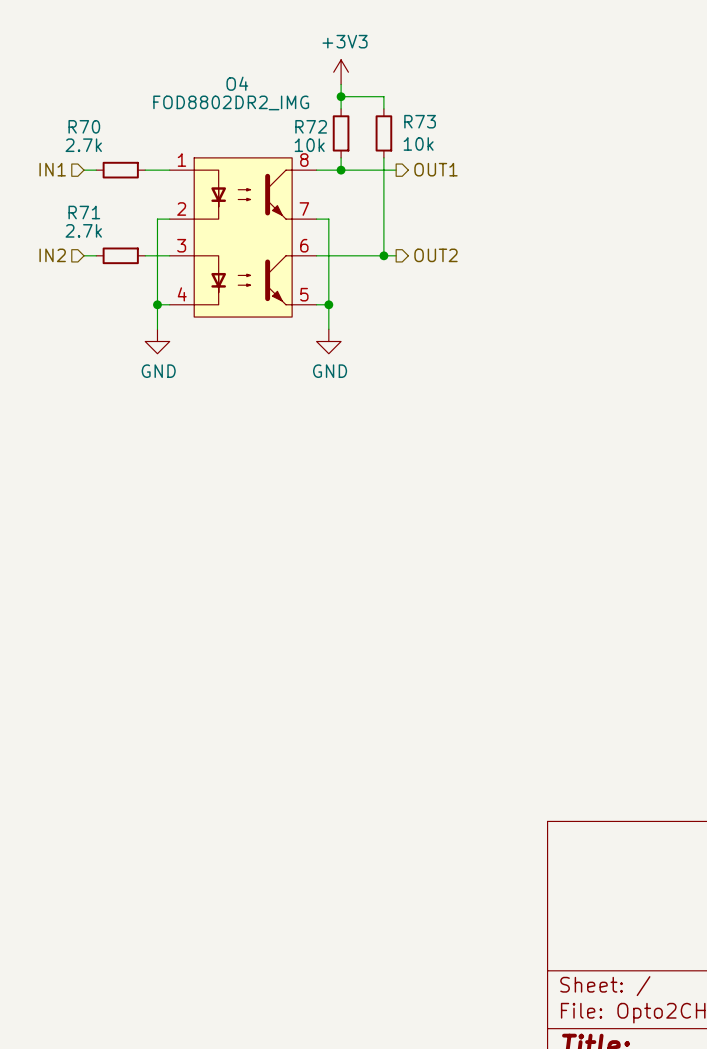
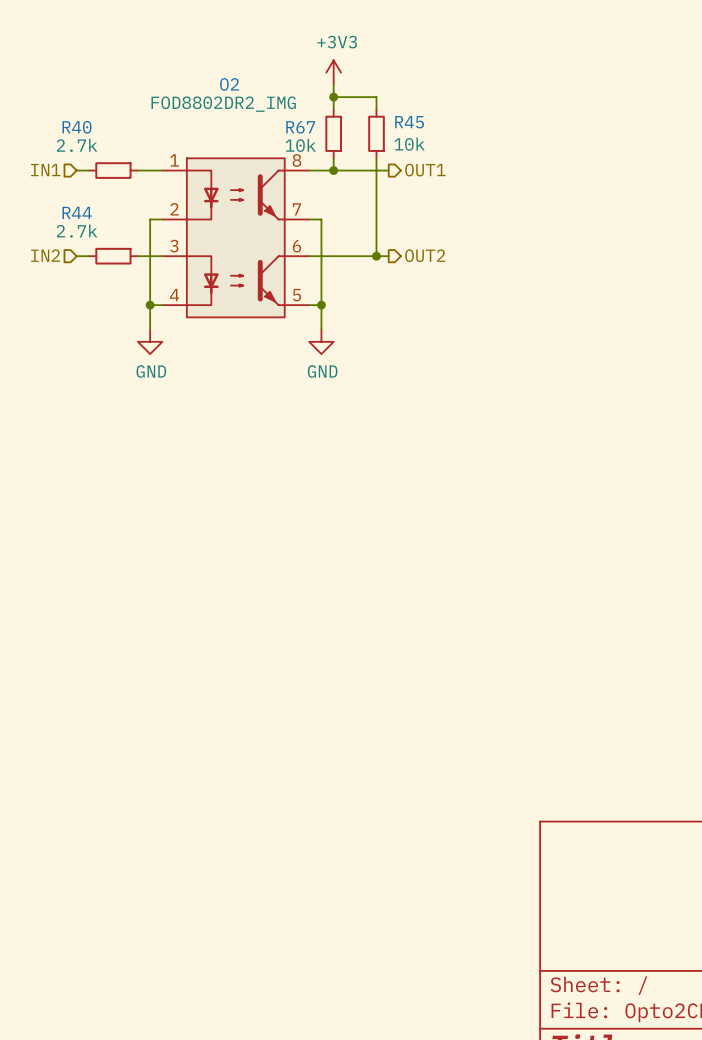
O4 name: O4 (237, 83) -> O2 (229, 84)
R73 name: R73 (420, 121) -> R45 (409, 122)
R70 name: R70 (84, 126) -> R40 (77, 127)
R72 name: R72 (311, 126) -> R67 (300, 127)
R71 name: R71 (84, 212) -> R44 (77, 212)

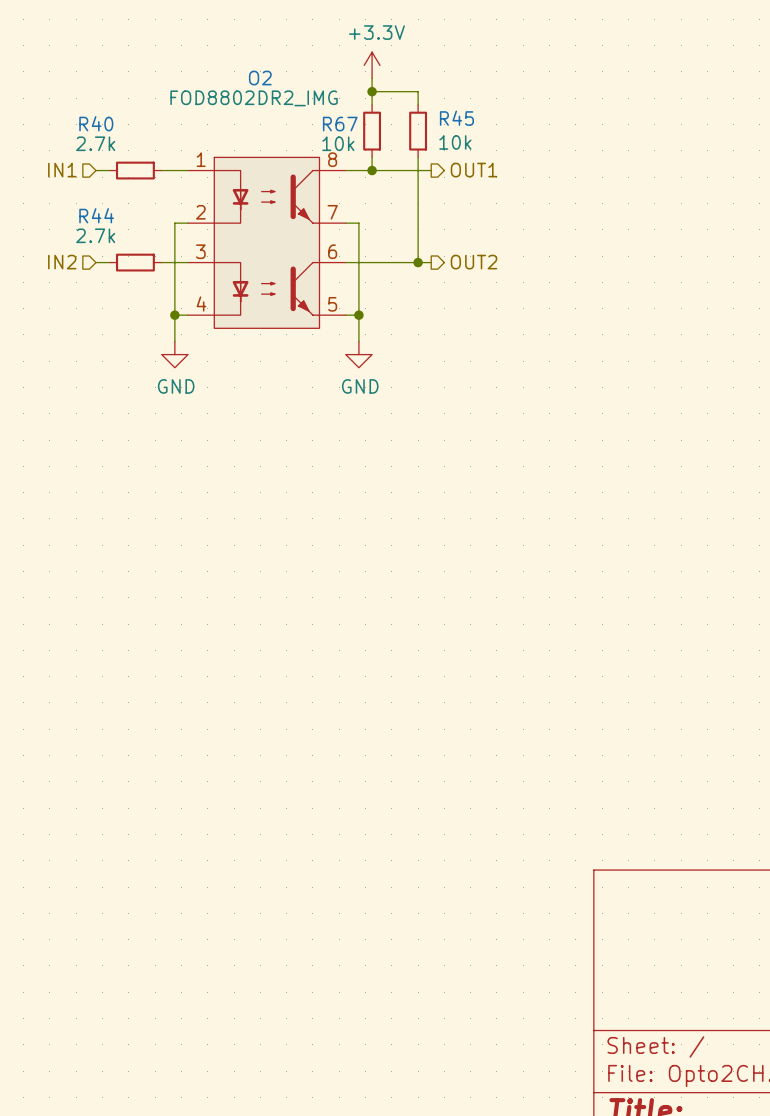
power symbol: +3V3 (333, 72) -> +3.3V (372, 65)

